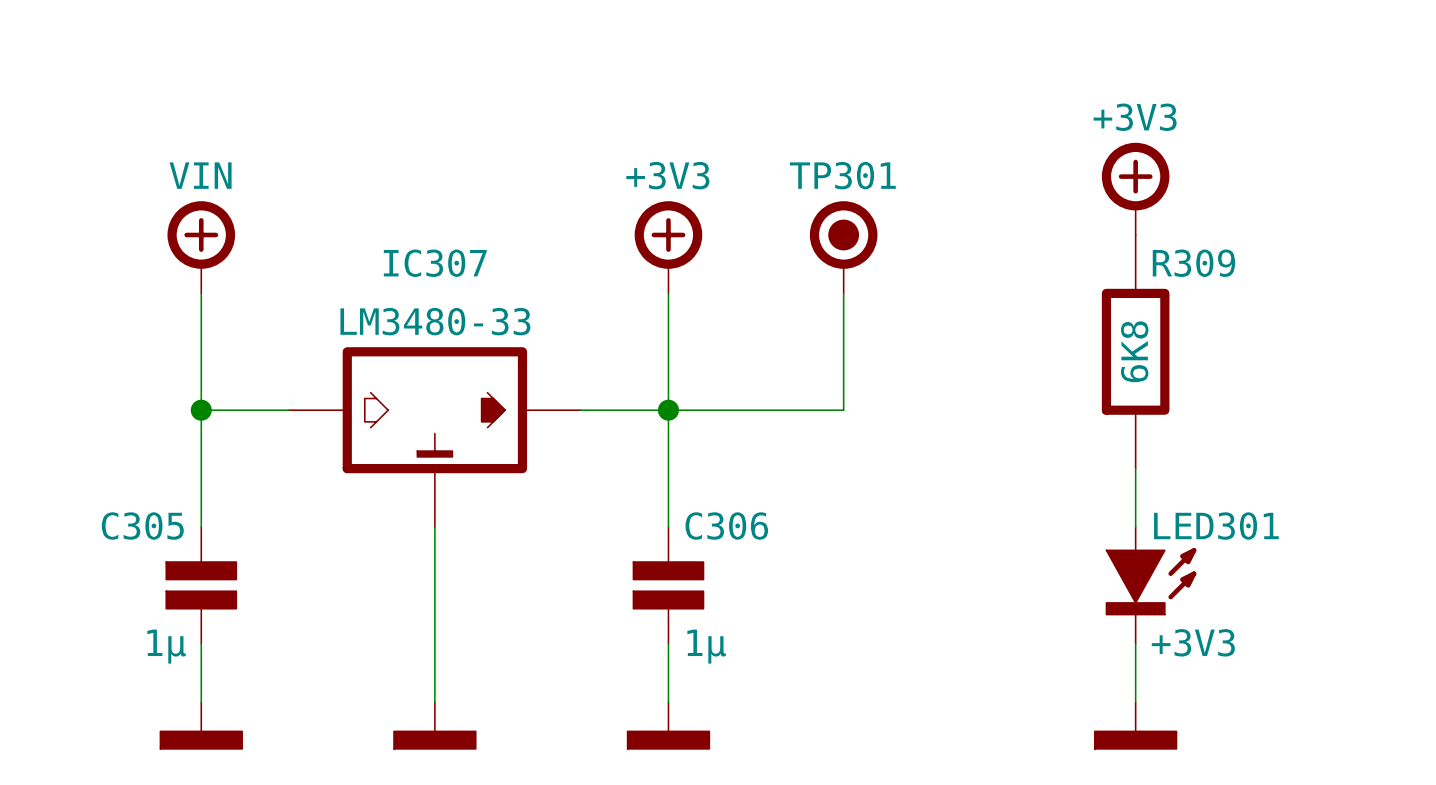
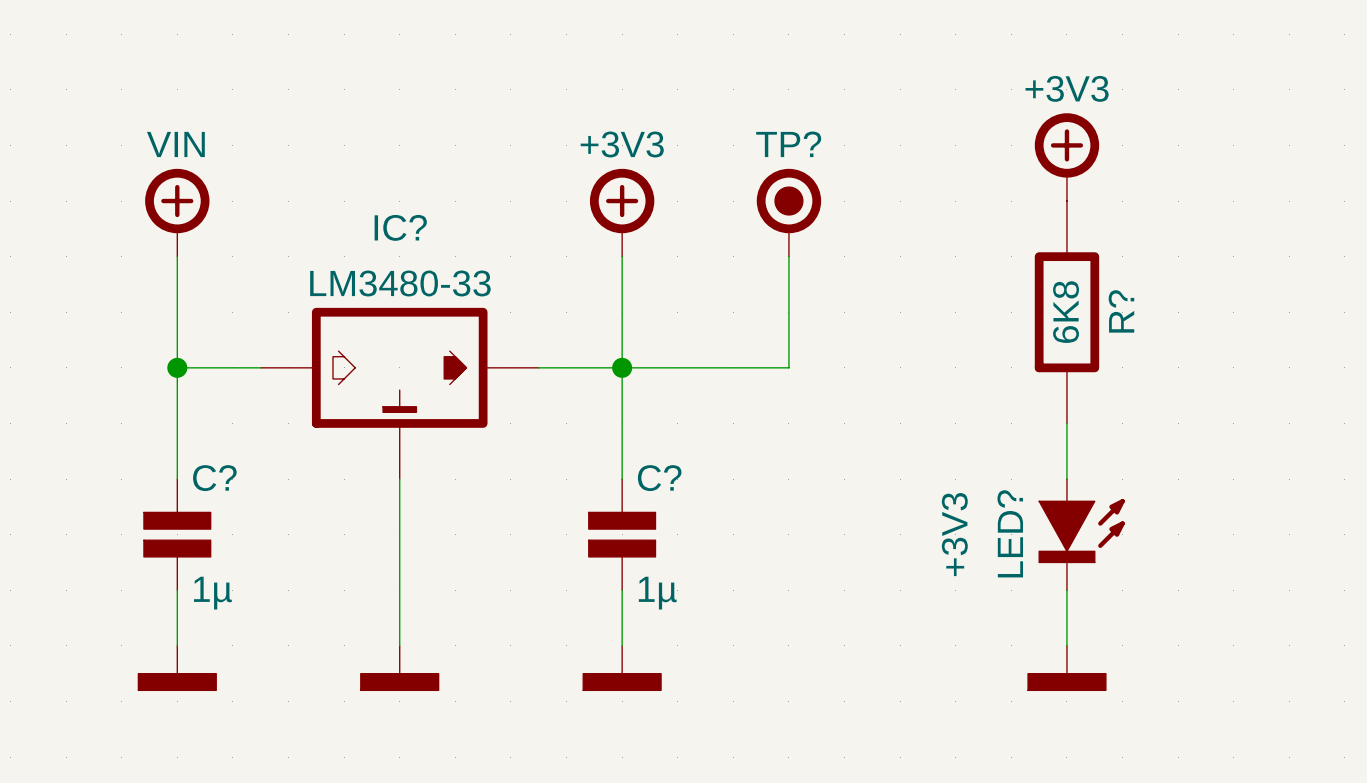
TP301 name: TP301 (842, 175) -> TP? (788, 144)
IC307 name: IC307 (435, 263) -> IC? (400, 227)
R309 name: R309 (1193, 263) -> R? (1121, 311)
C305 name: C305 (142, 526) -> C? (214, 478)
C306 name: C306 (726, 526) -> C? (659, 478)
LED301 name: LED301 (1216, 526) -> LED? (1010, 533)
LED301 value rotation: 0° (1193, 642) -> 90° counterclockwise (954, 534)
LED301 value position: +3V3 (1193, 642) -> +3V3 (954, 534)
C305 value position: 1µ (166, 646) -> 1µ (212, 593)

